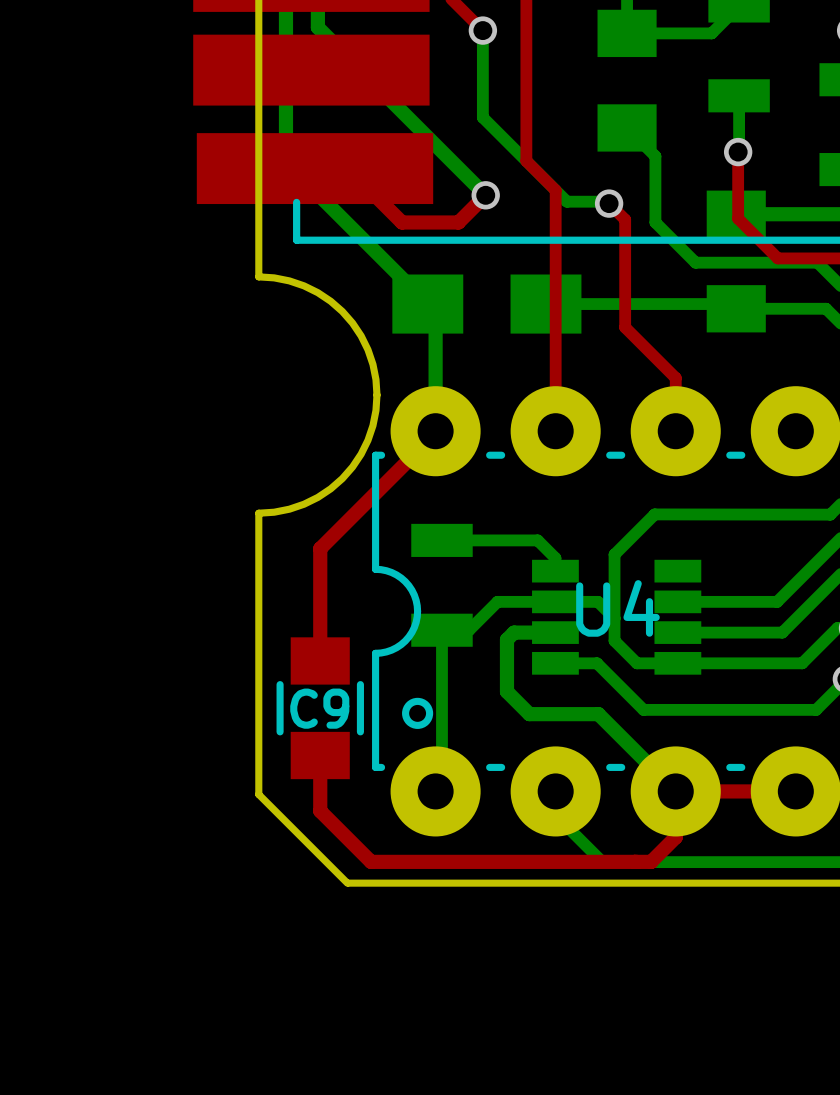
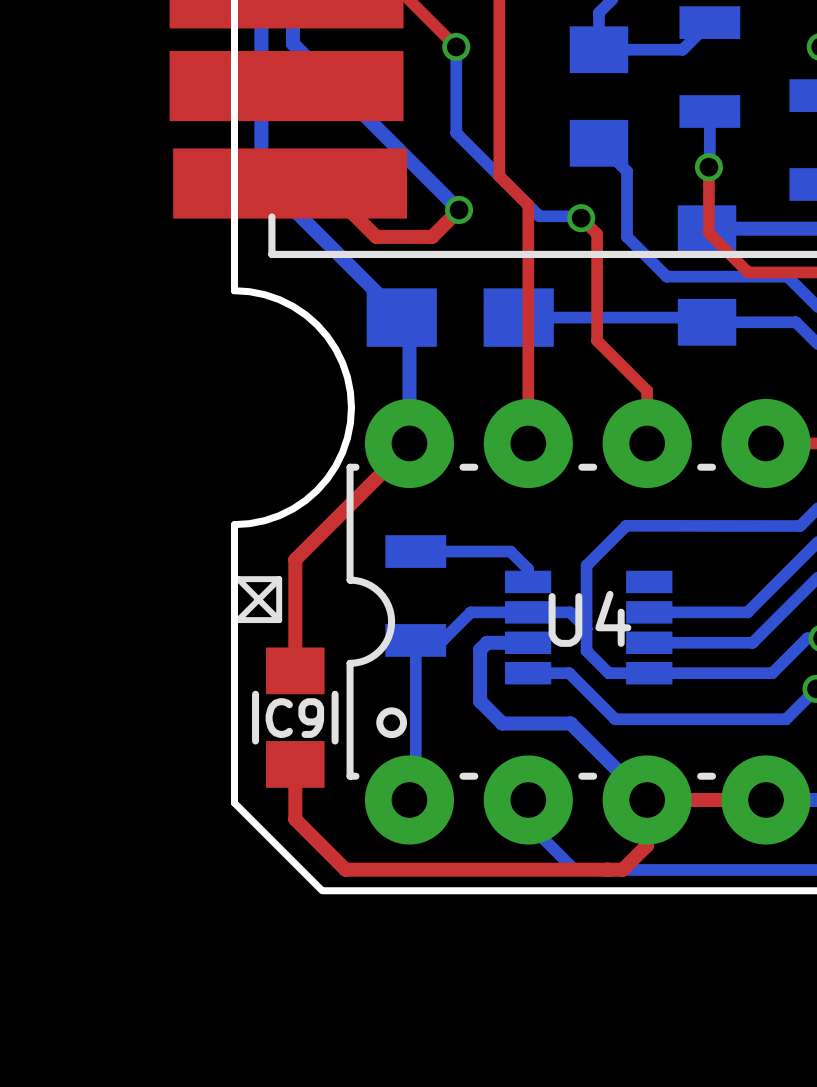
line: none -> (278, 580) (238, 620) (279, 620)
line: none -> (279, 620) (279, 579) (238, 579) (279, 620)

